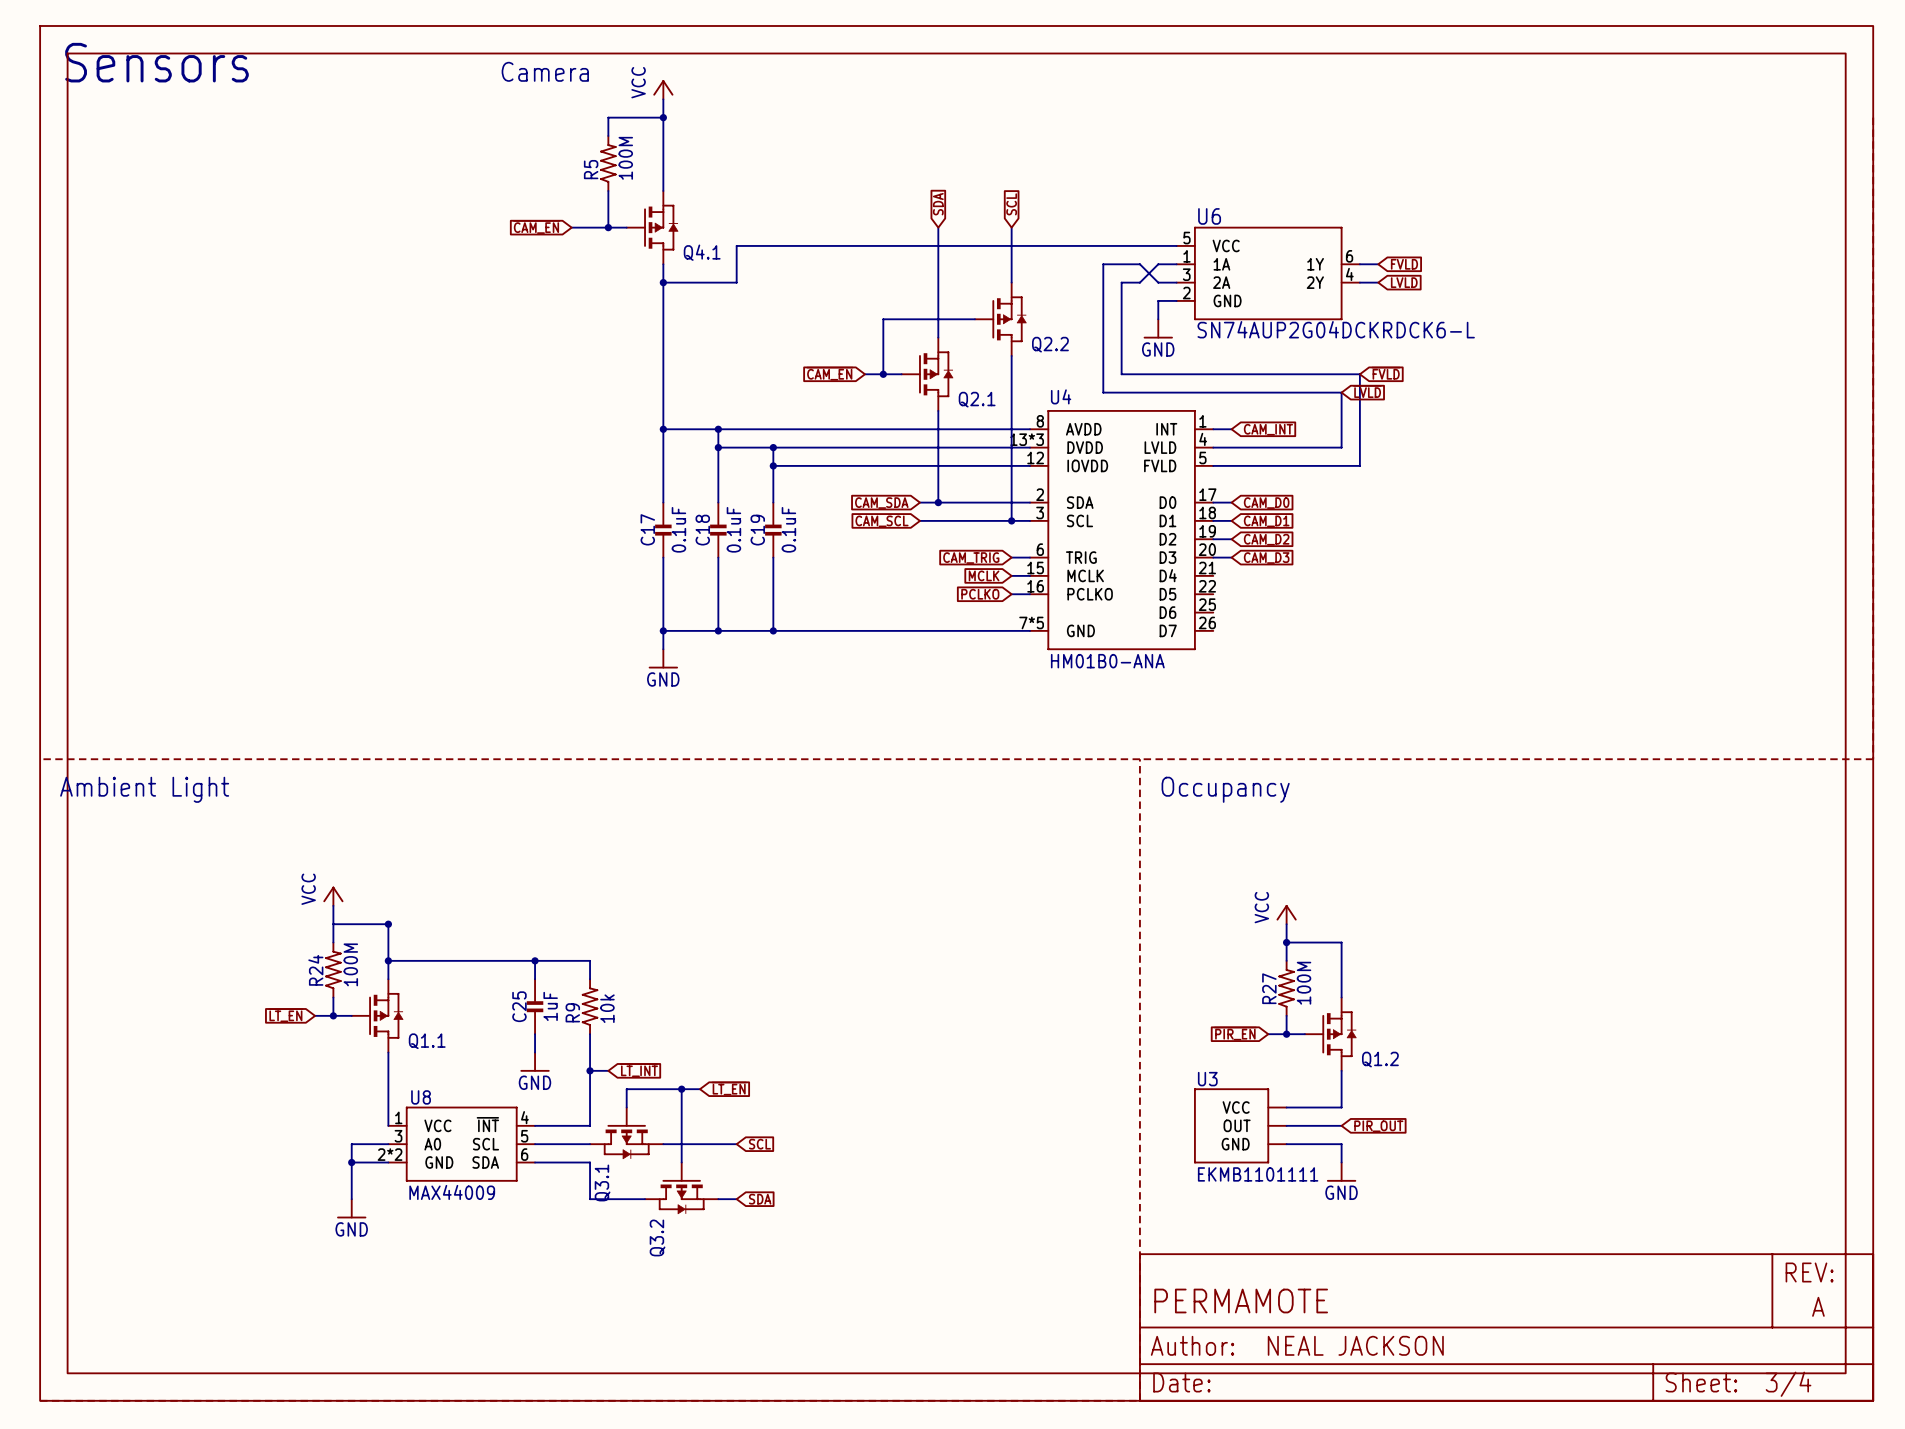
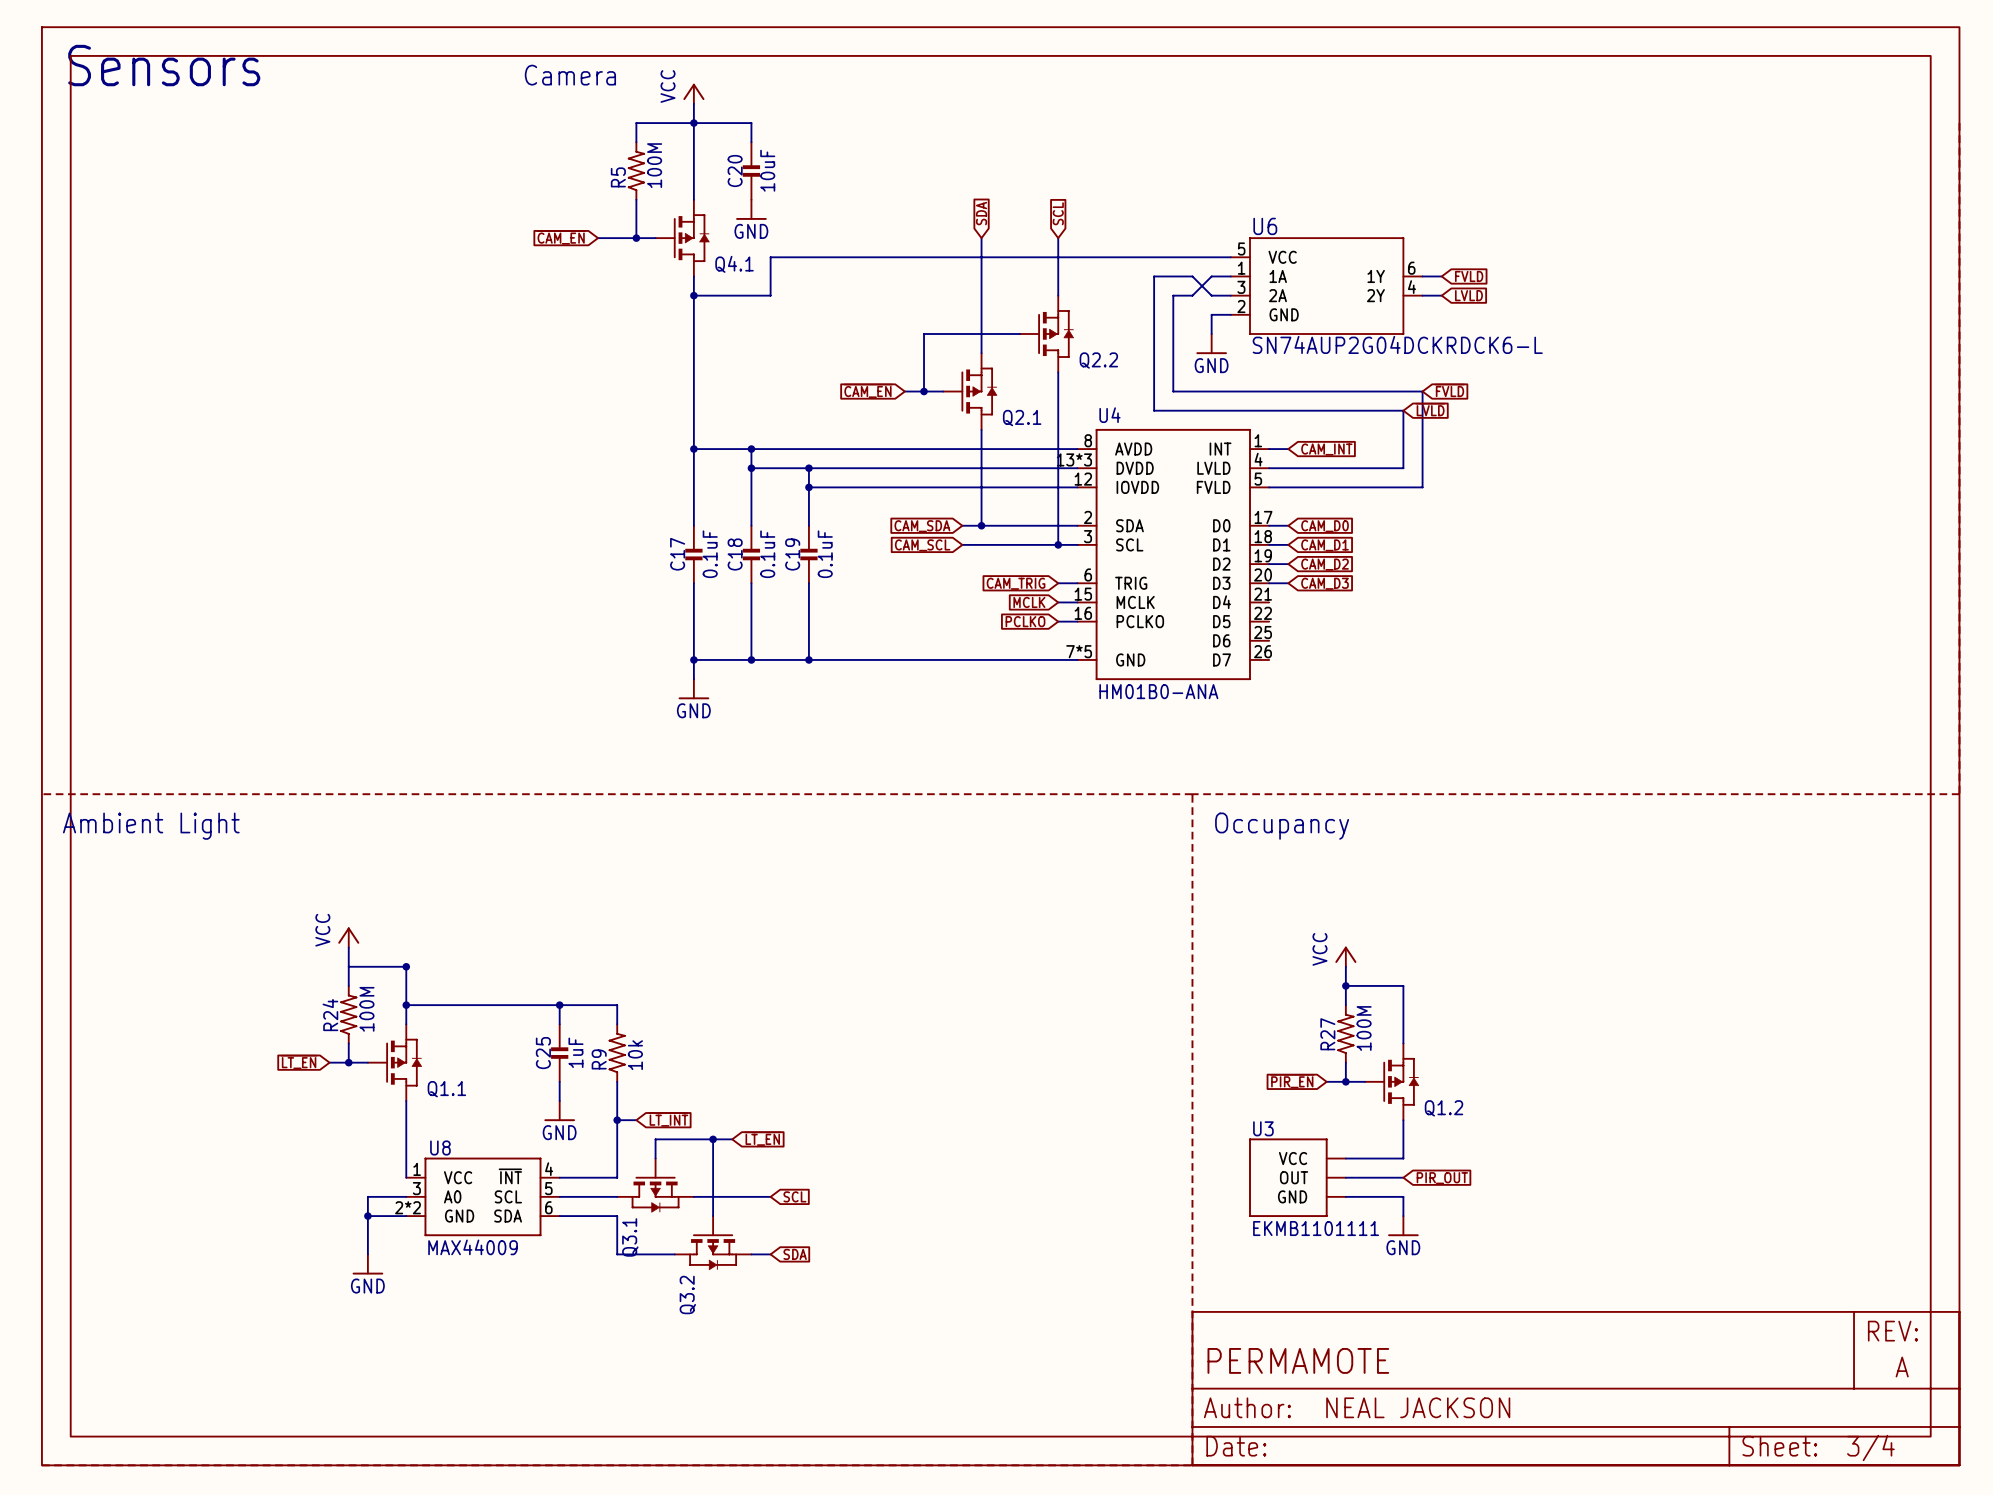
wire: none -> (693, 123) (751, 123) (751, 142)
C20: none -> 10uF (751, 171)
power symbol: none -> GND (751, 209)

